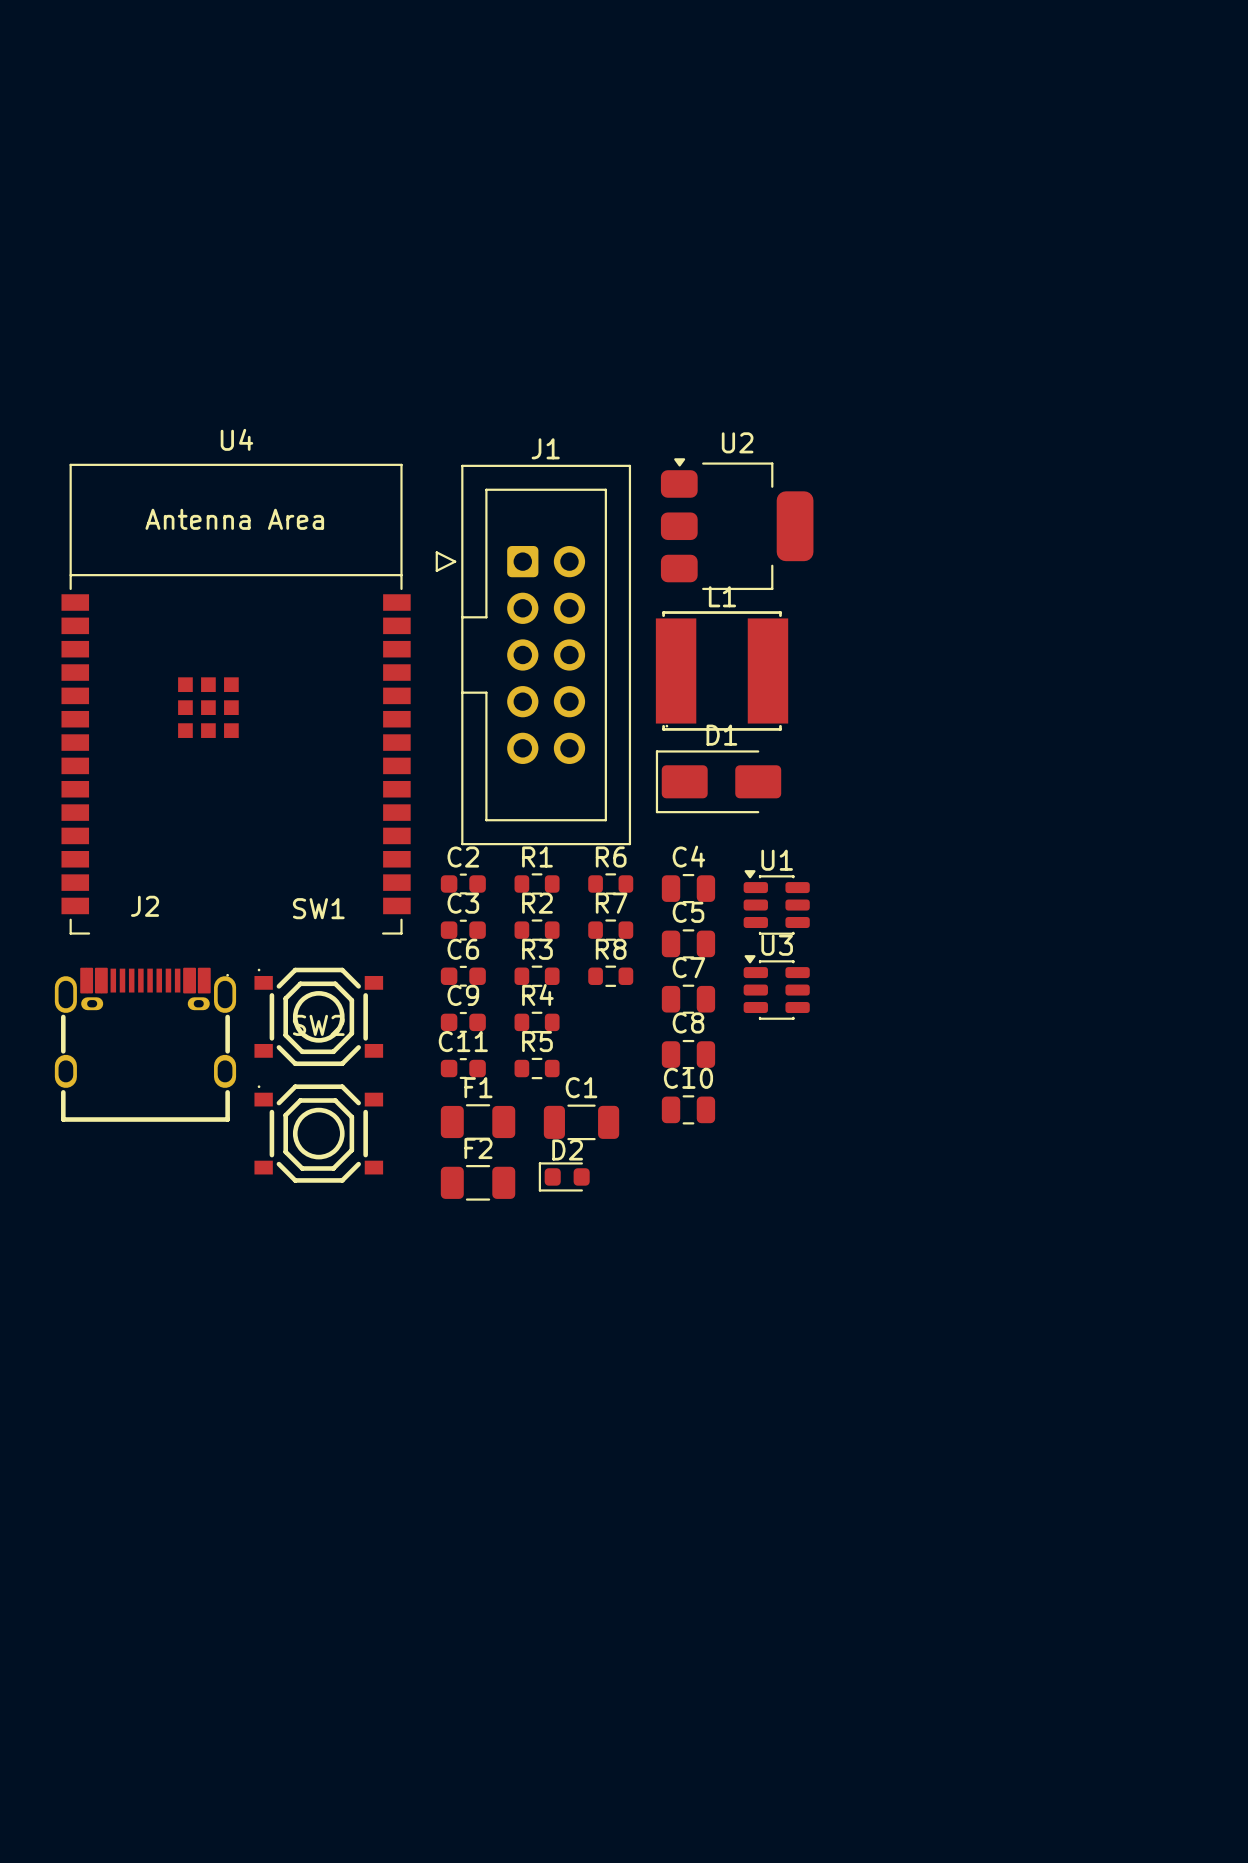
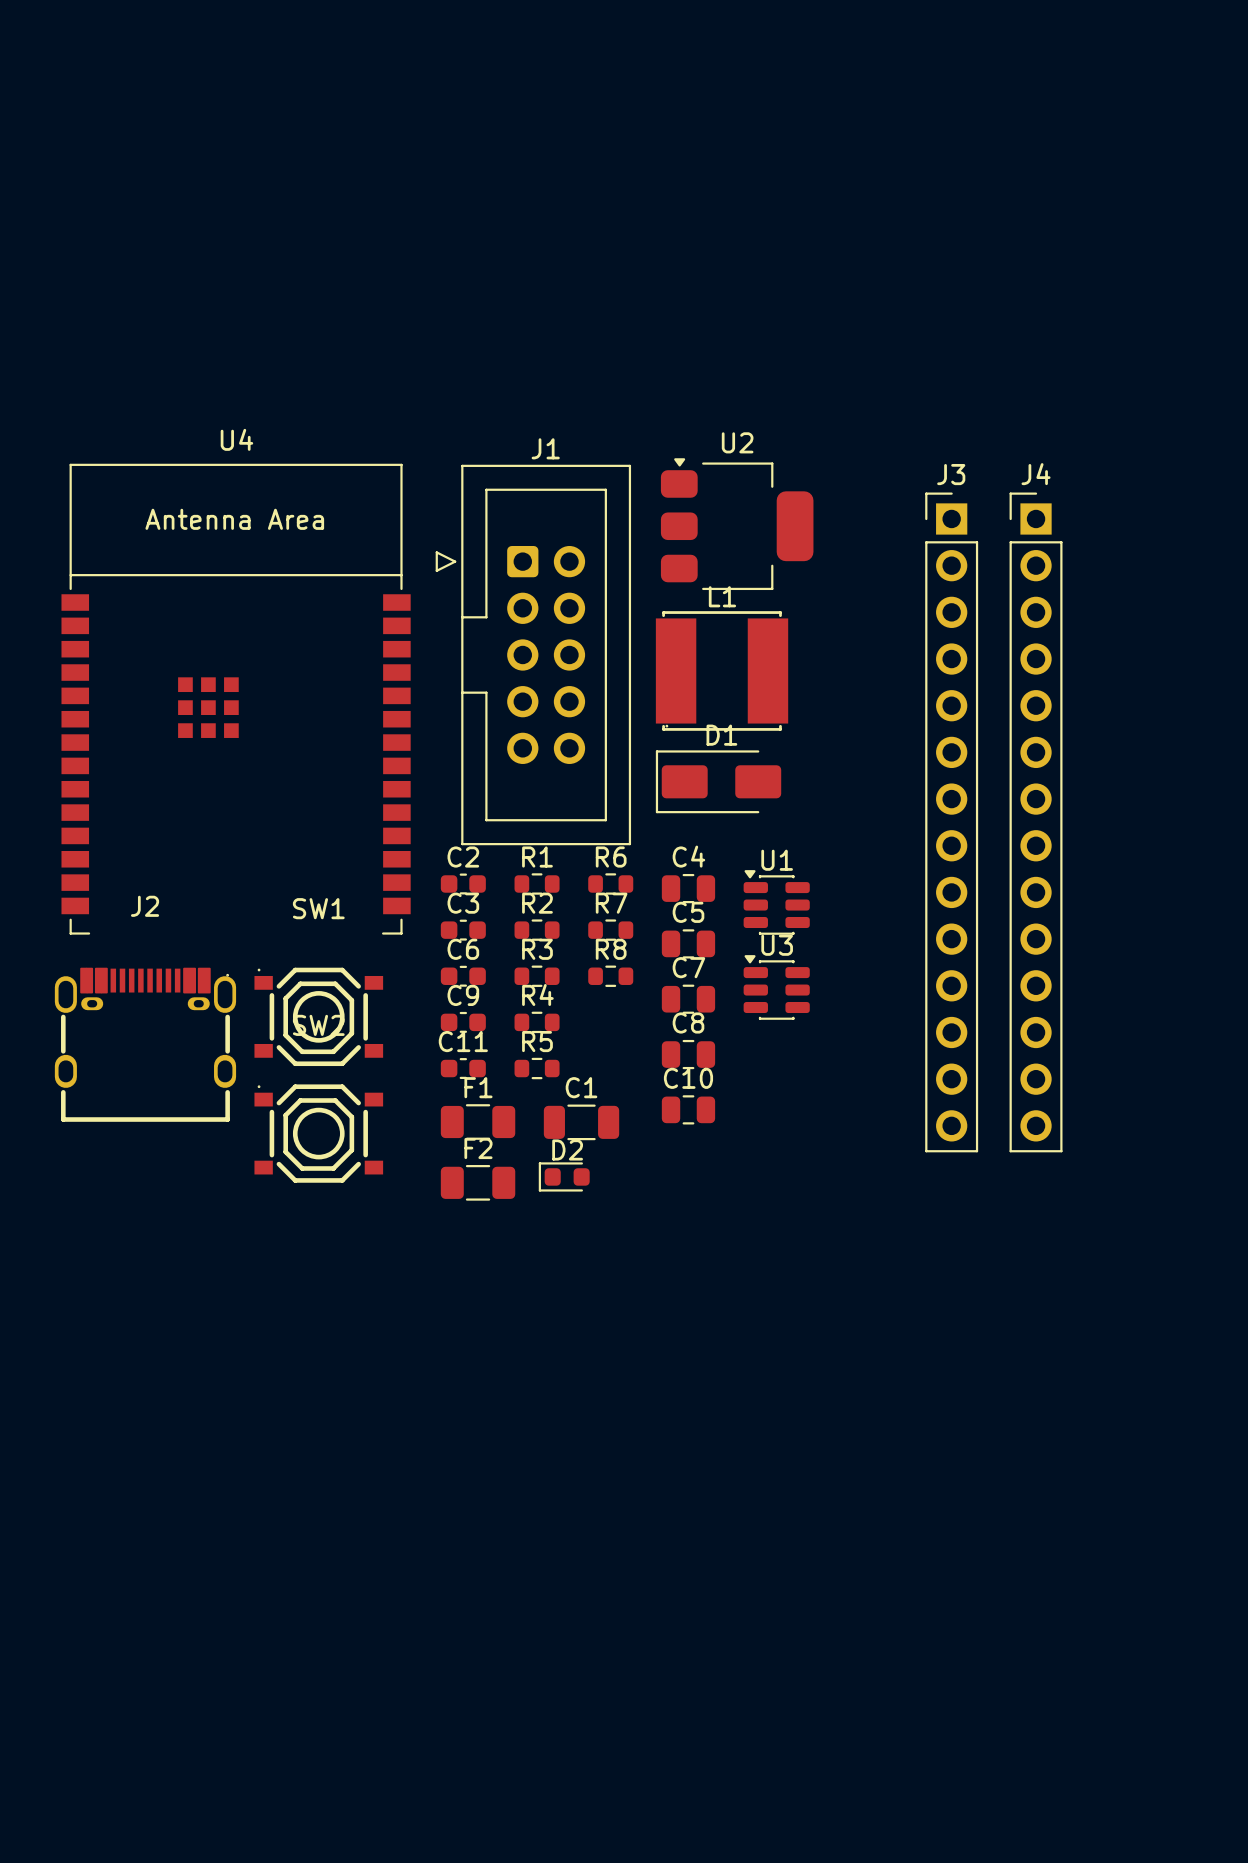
J3: none -> (951, 822)
J4: none -> (1036, 822)

